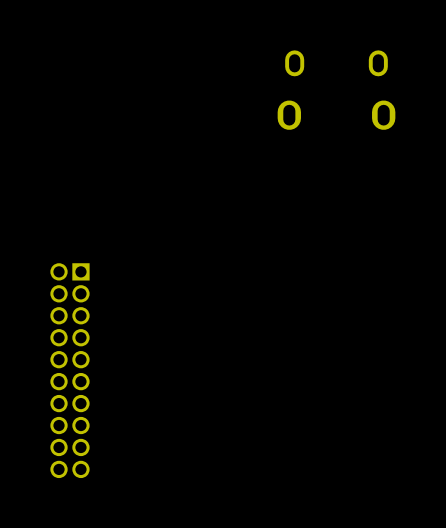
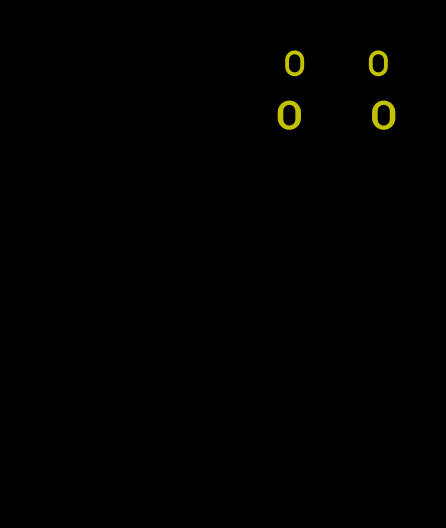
part: (69, 370) -> none

